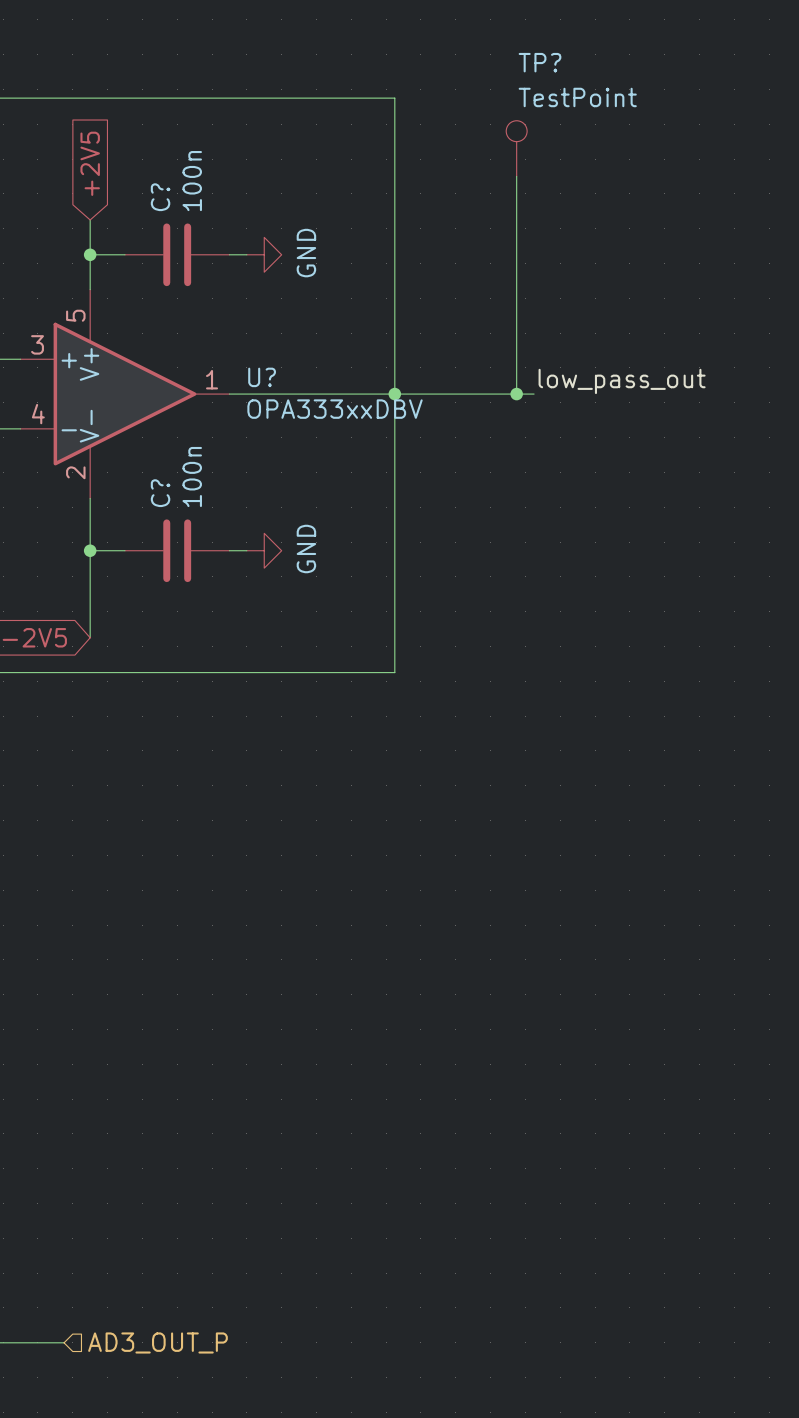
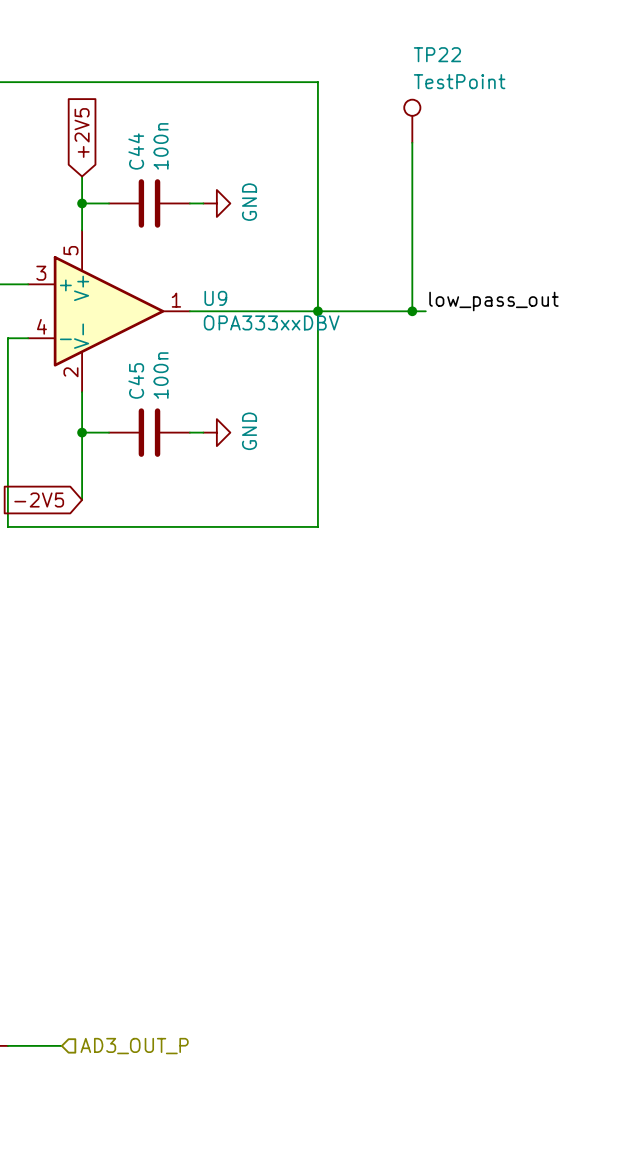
TP? name: TP? (540, 62) -> TP22 (437, 54)
C? name: C? (160, 197) -> C44 (136, 151)
U? name: U? (262, 377) -> U9 (215, 298)
C? name: C? (160, 493) -> C45 (136, 380)

